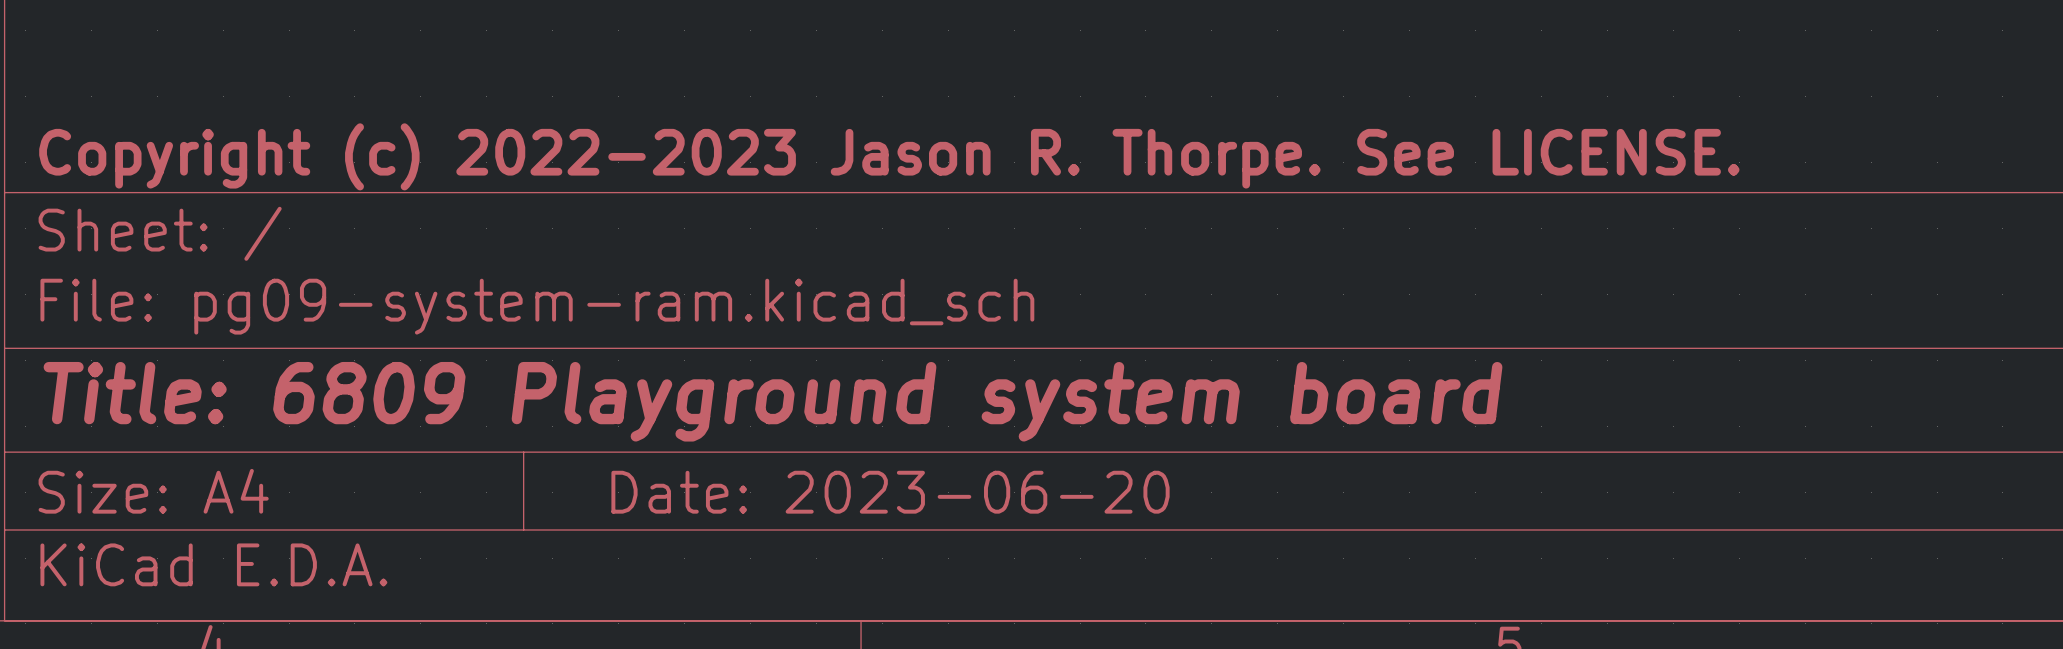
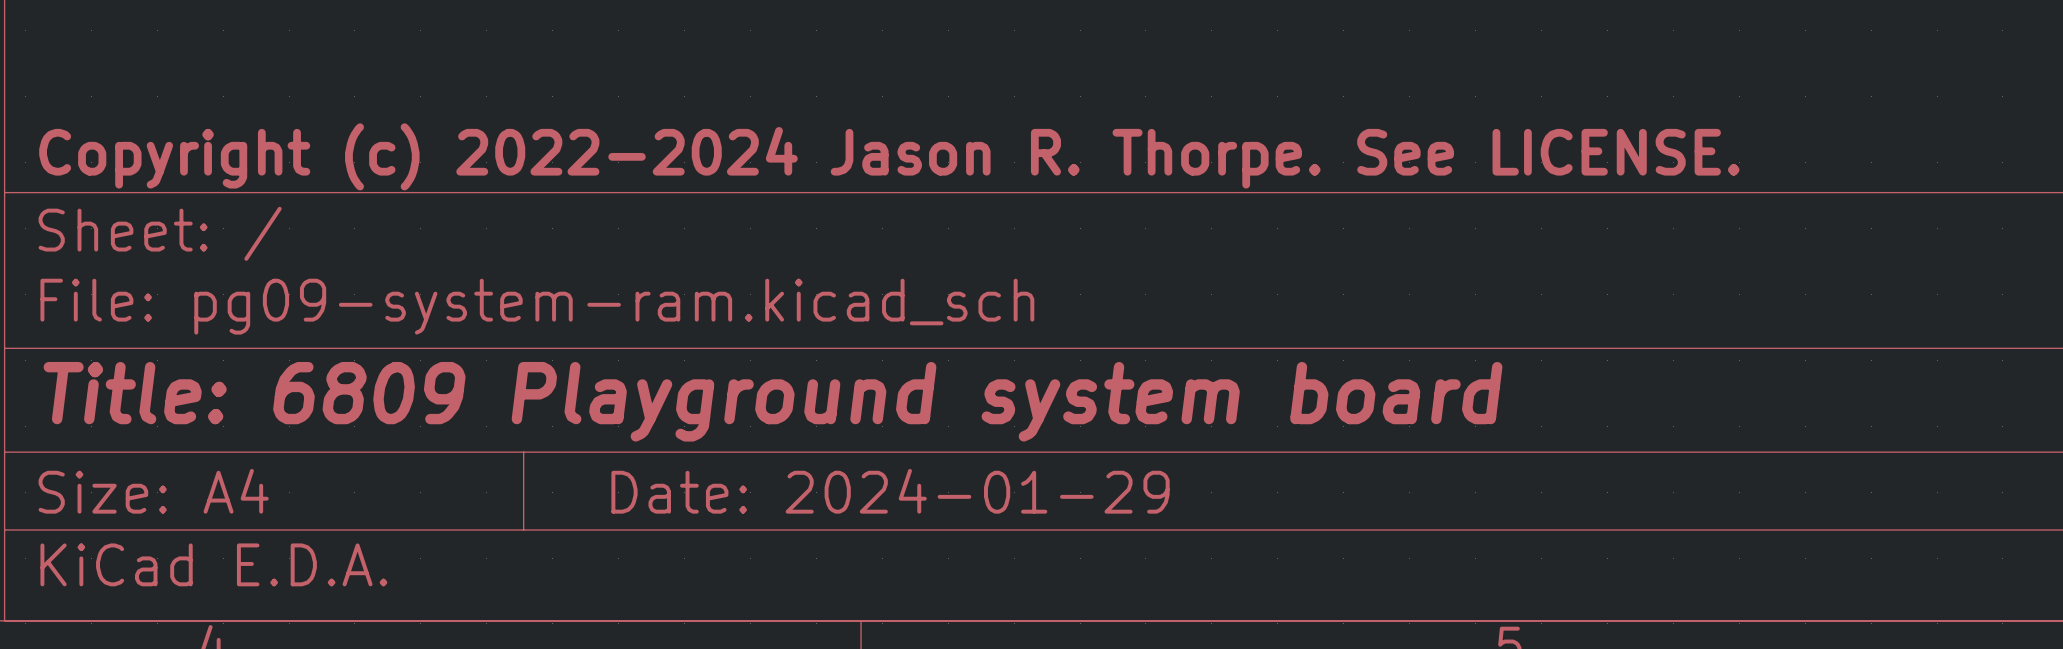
title block: Copyright (c) 2022-2023 Jason R. Thorpe. See LICENSE. (889, 156) -> Copyright (c) 2022-2024 Jason R. Thorpe. See LICENSE. (889, 156)
title block: Date: 2023-06-20 (890, 492) -> Date: 2024-01-29 (890, 491)

